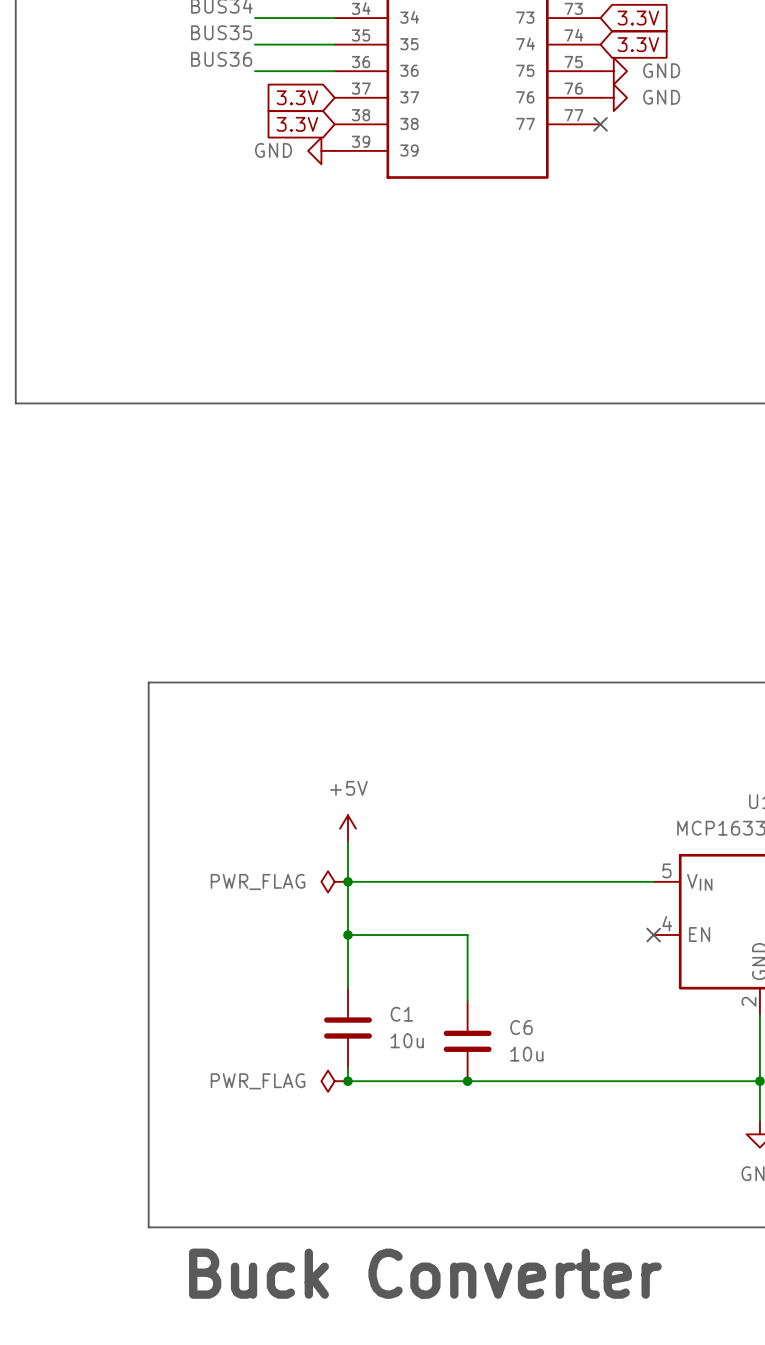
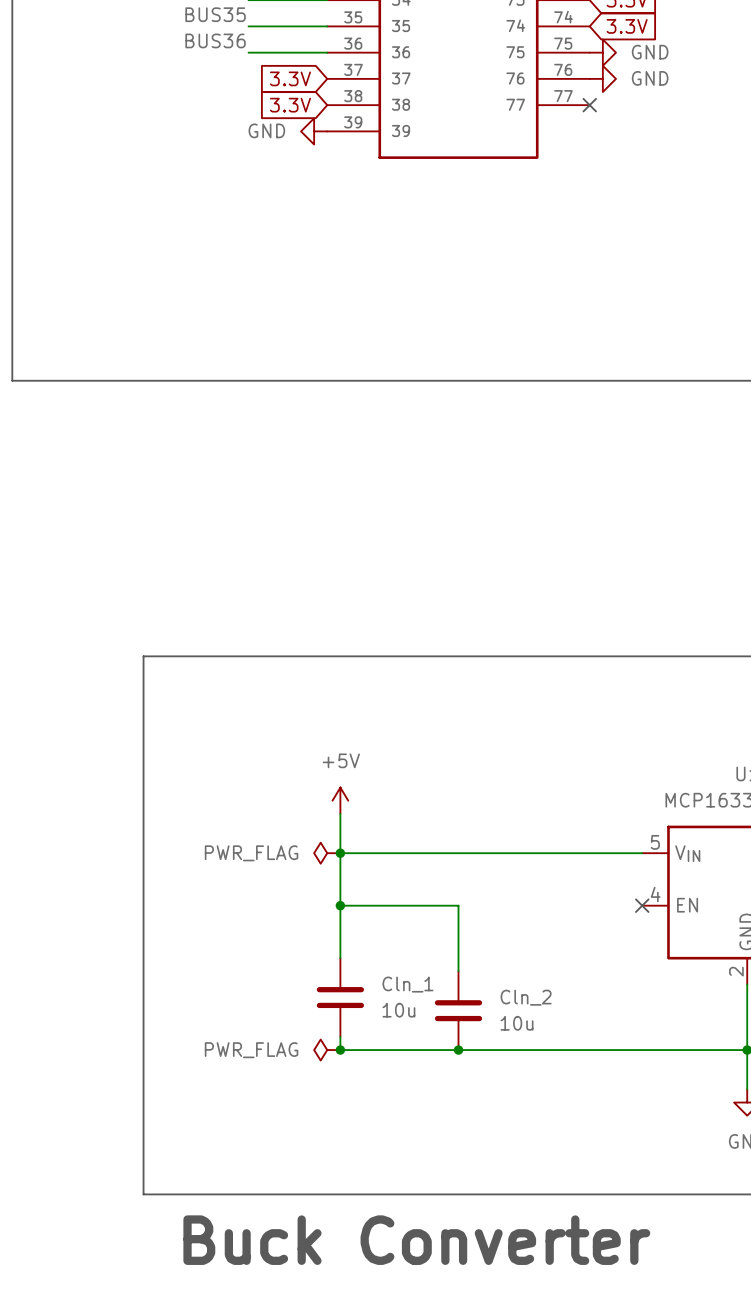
C1 name: C1 (401, 1014) -> Cln_1 (407, 984)
C6 name: C6 (521, 1027) -> Cln_2 (526, 997)

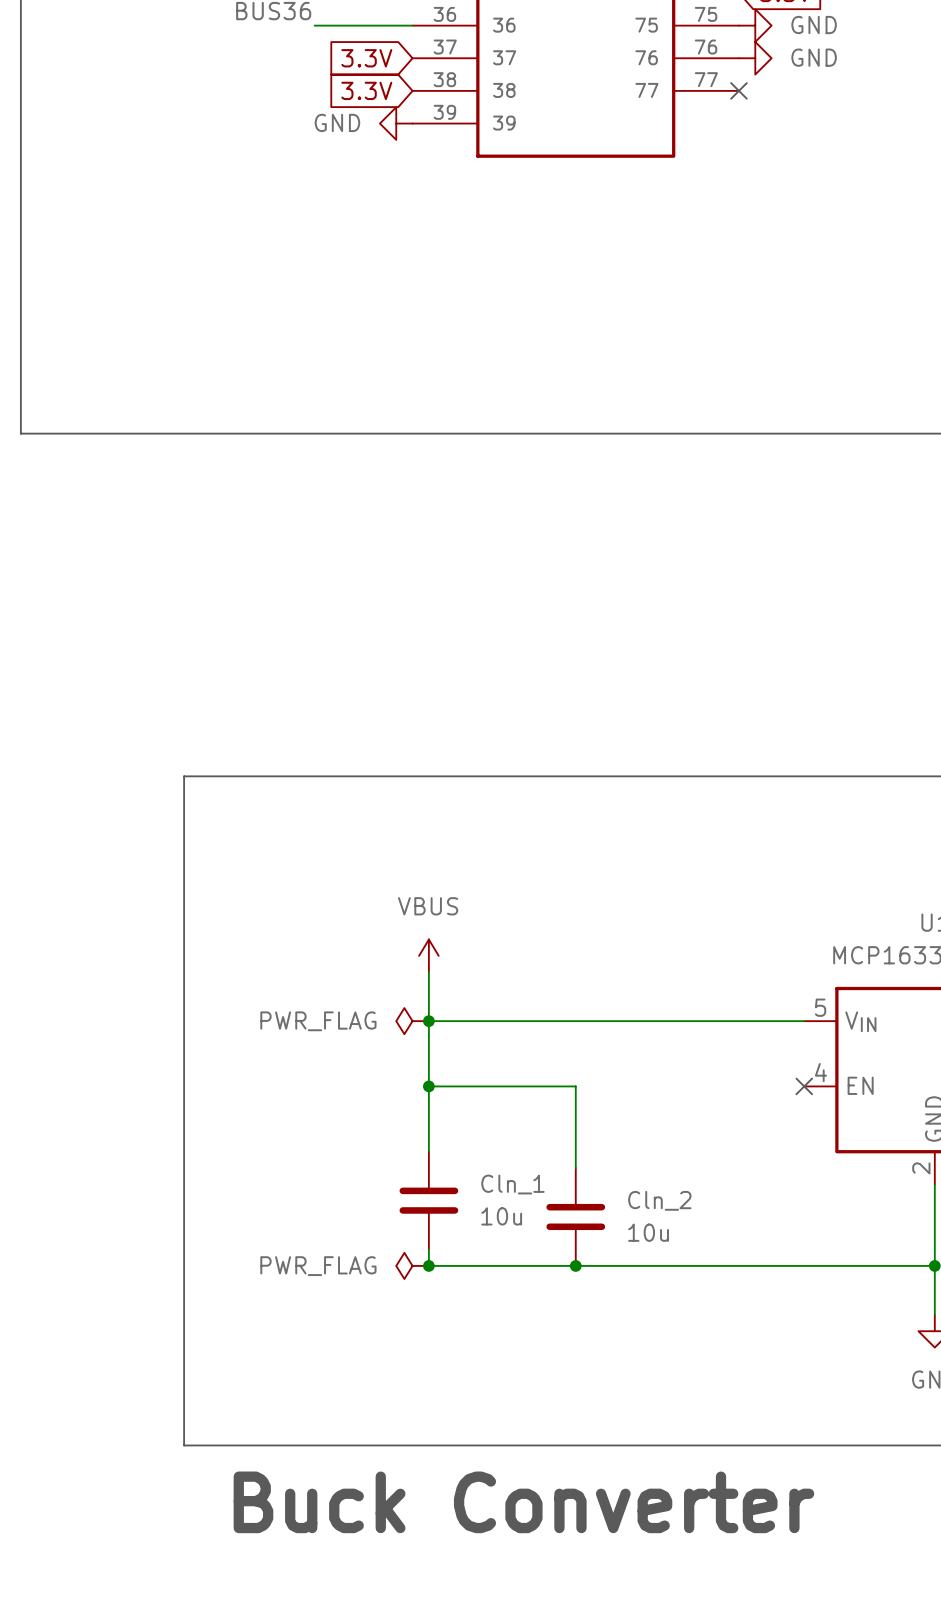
power symbol: +5V (340, 800) -> VBUS (428, 955)

